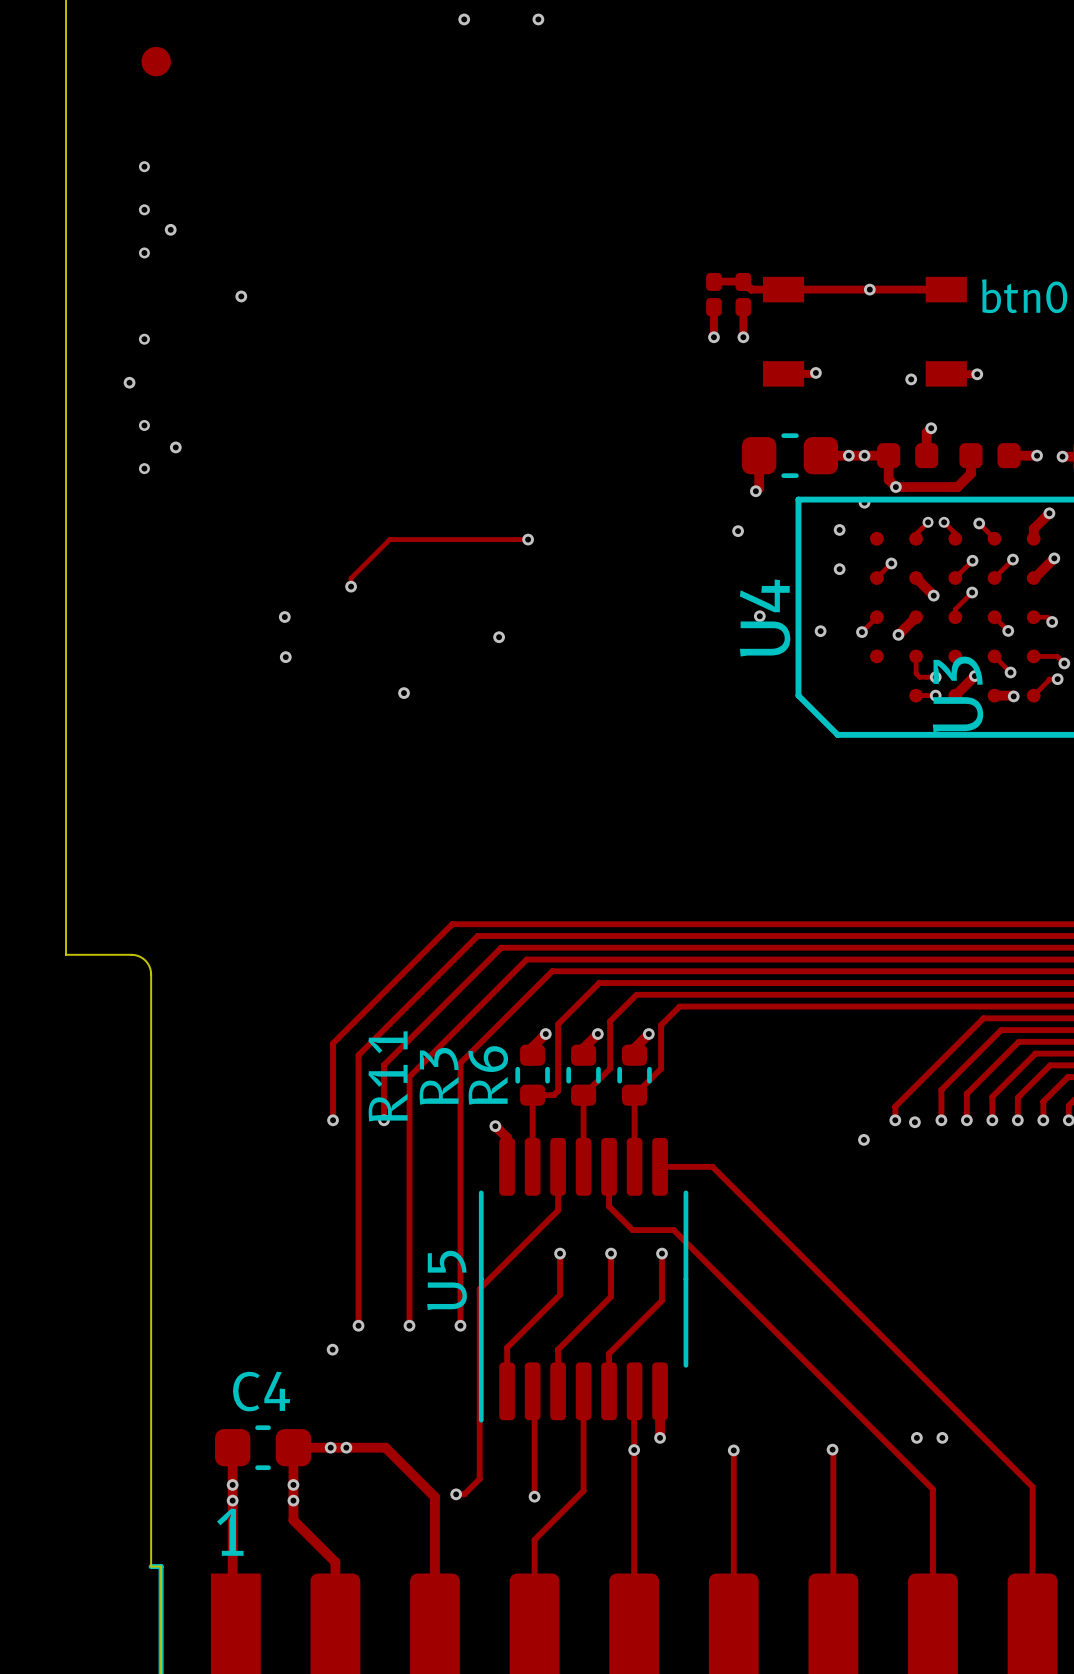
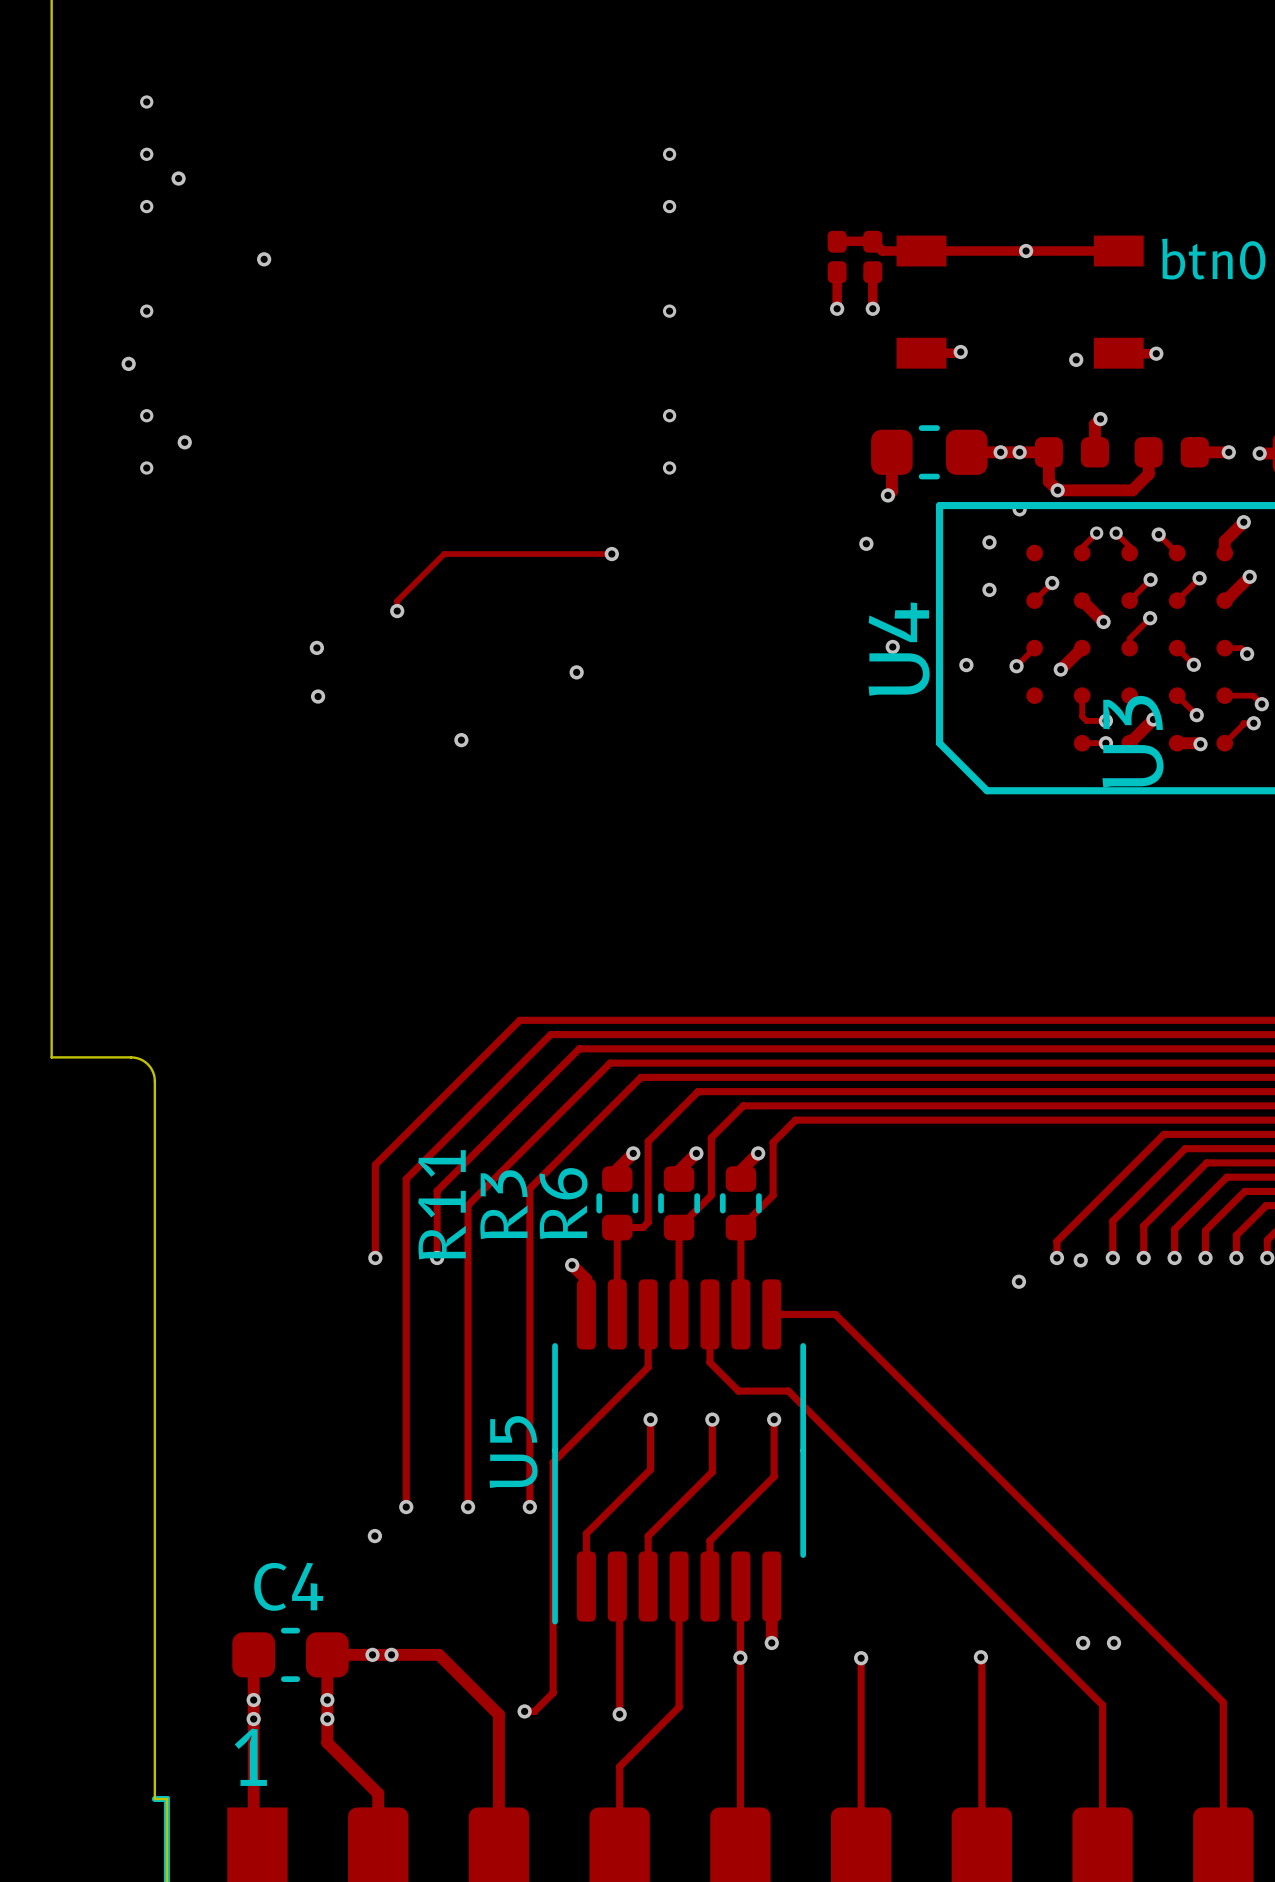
via: none -> (669, 154)
via: none -> (669, 206)
via: none -> (669, 311)
via: none -> (669, 415)
via: none -> (669, 468)

